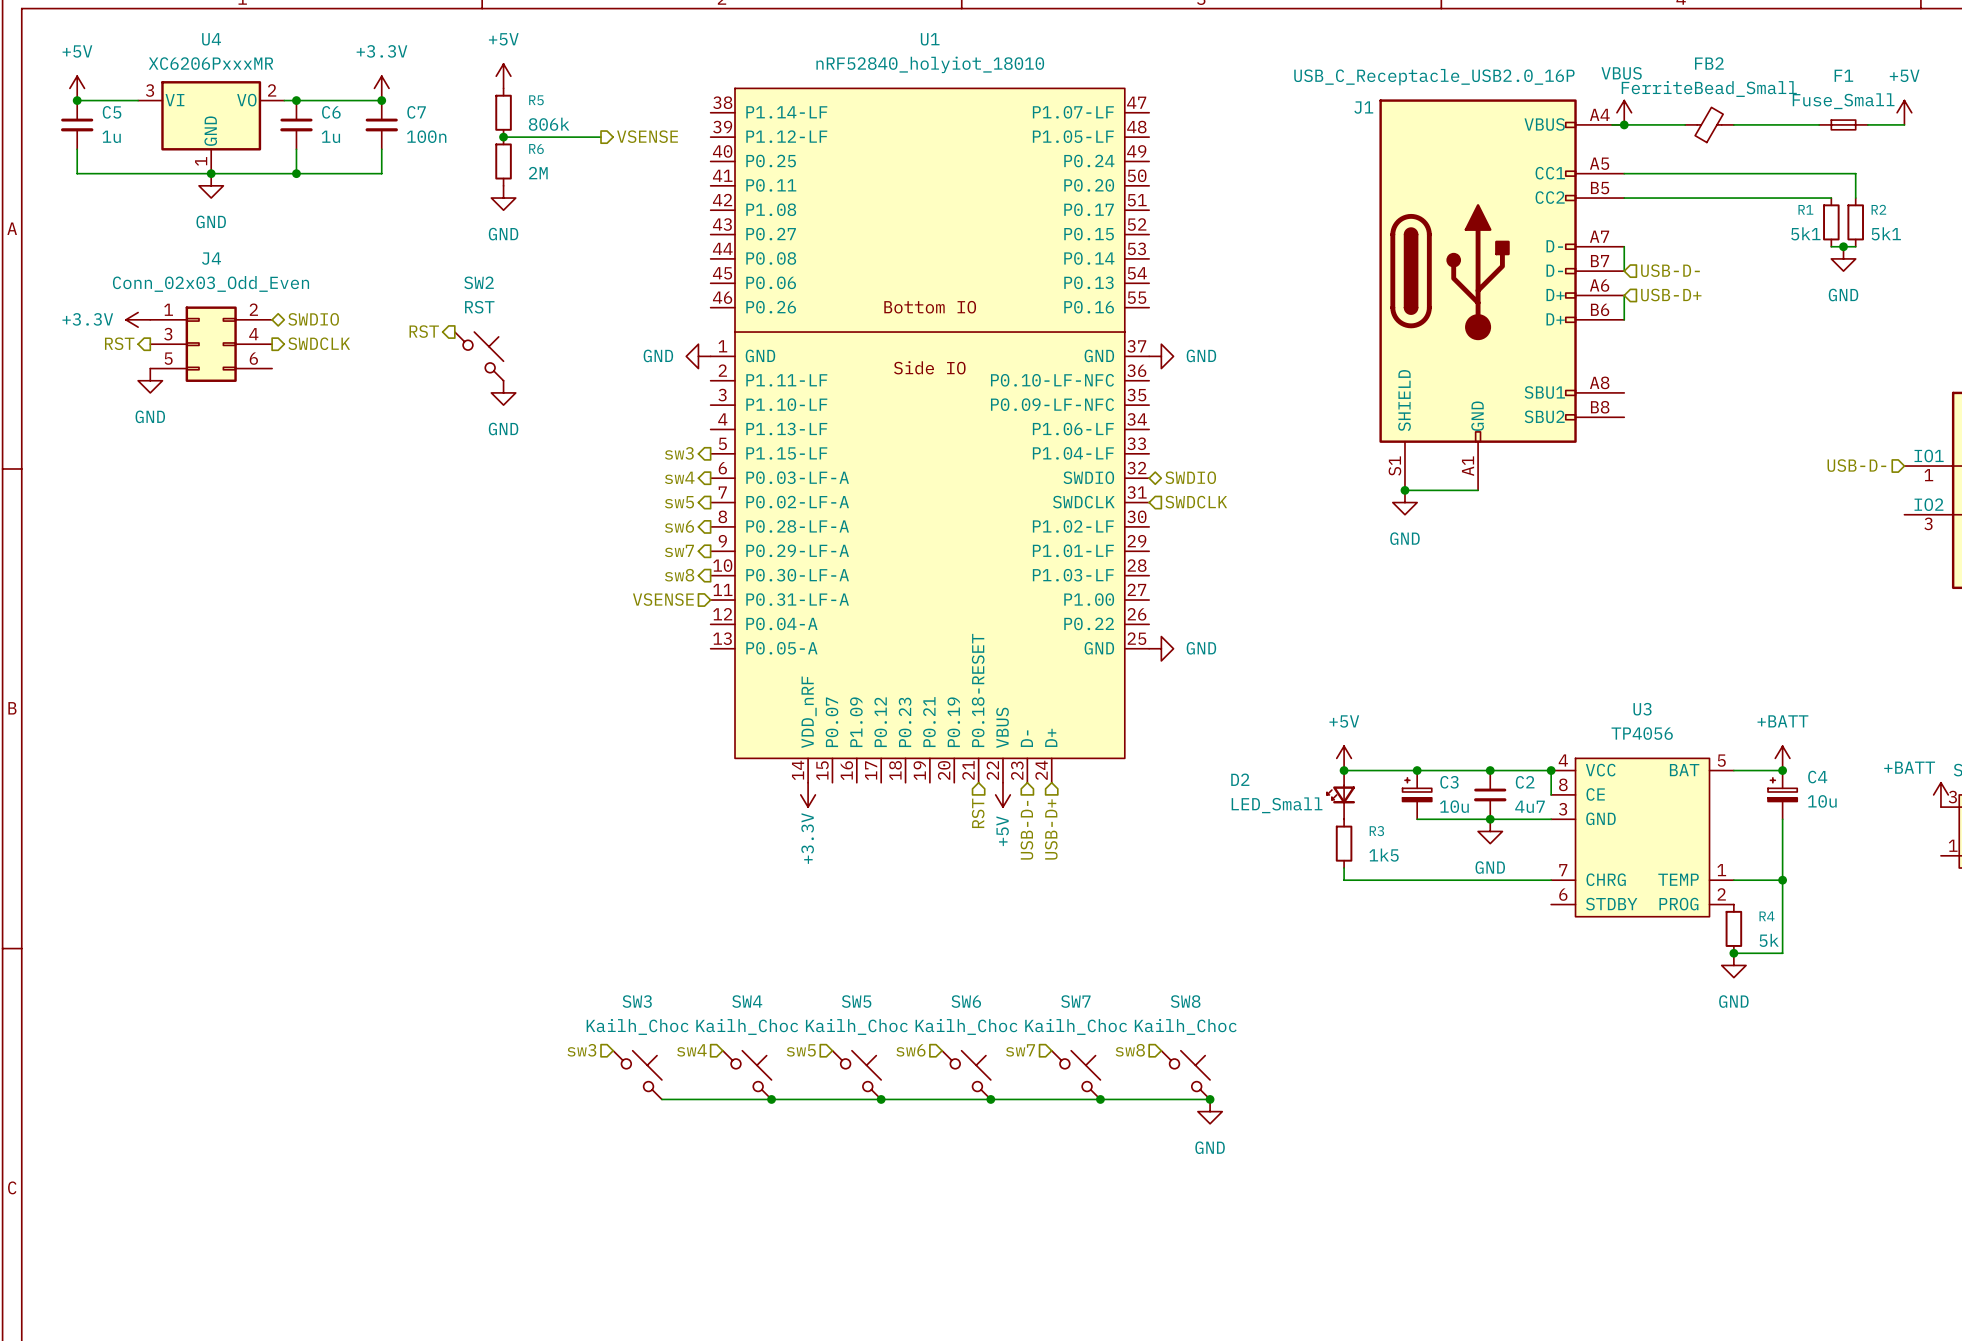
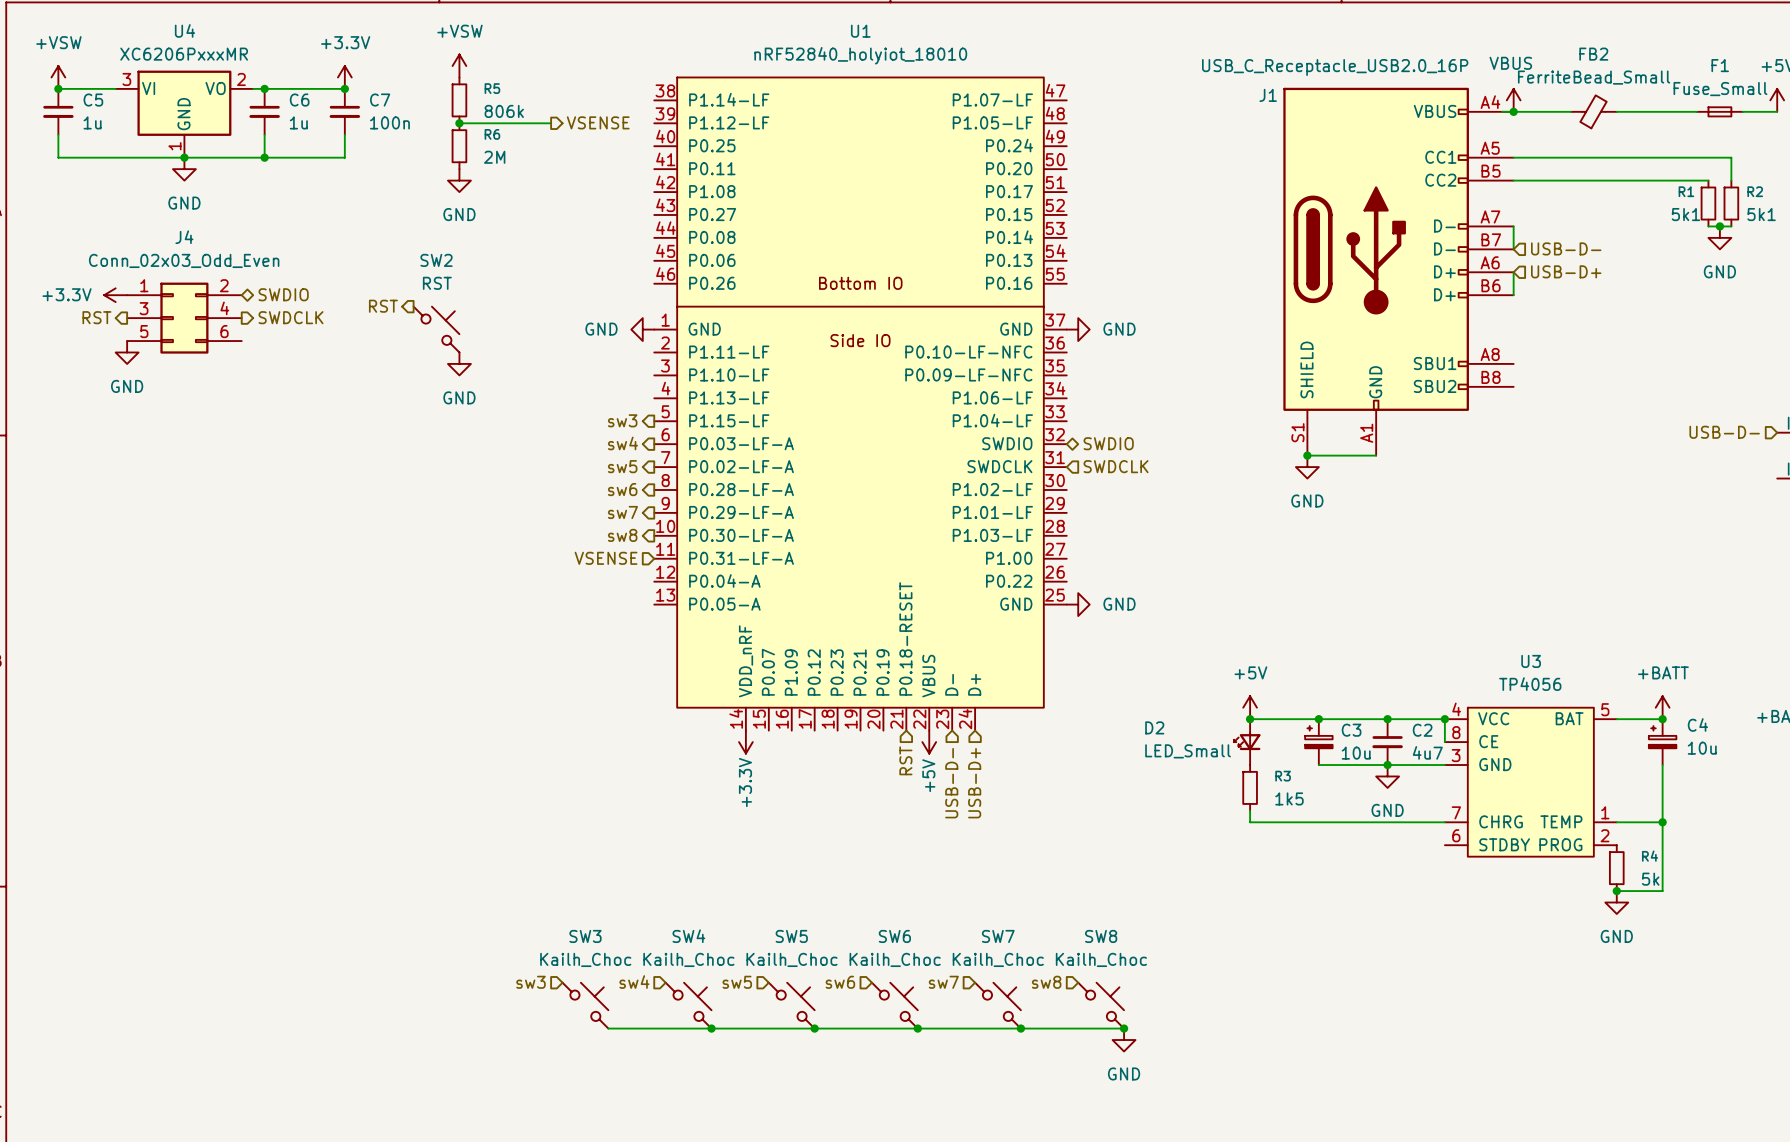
power symbol: +5V (503, 76) -> +VSW (459, 66)
power symbol: +5V (77, 88) -> +VSW (58, 77)

